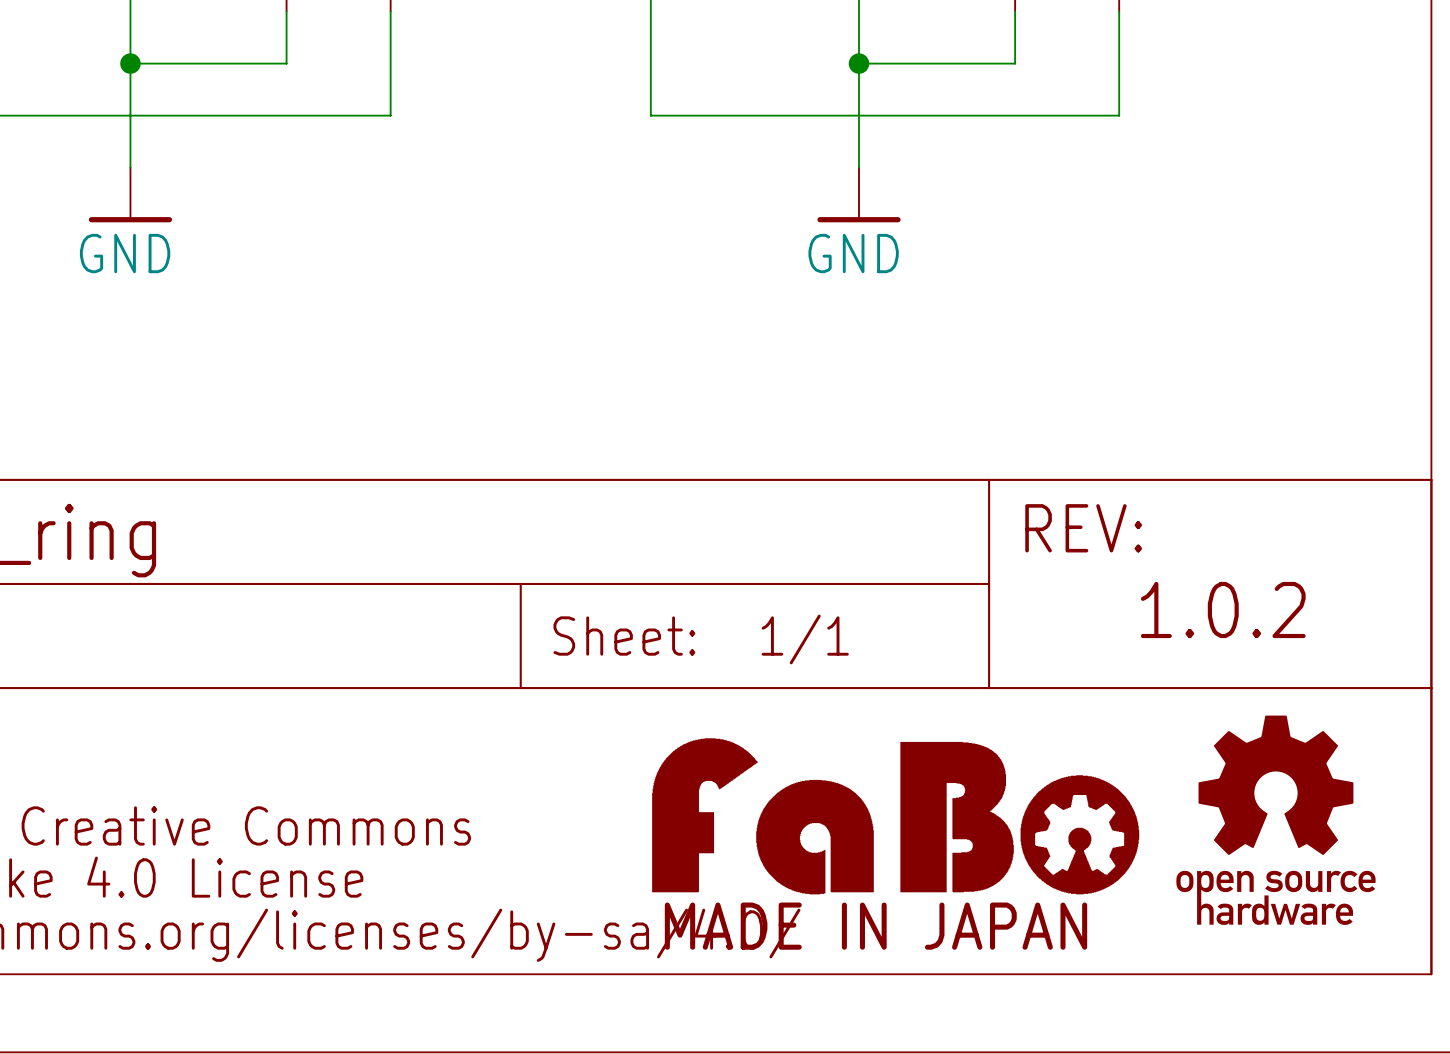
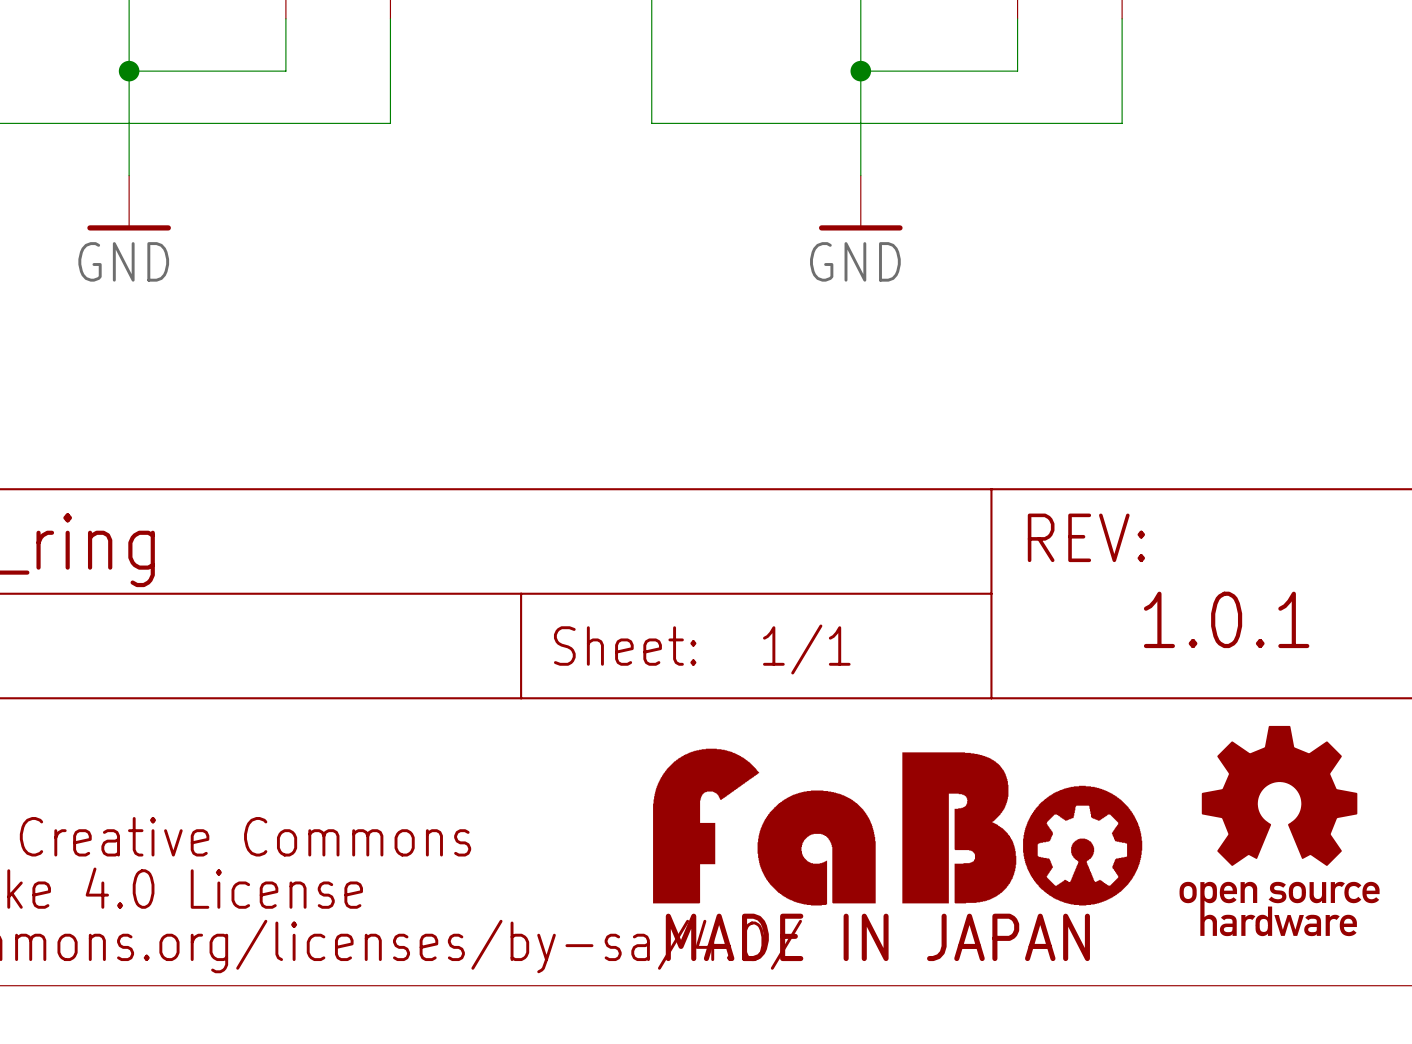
text: 1.0.2 (1223, 610) -> 1.0.1 (1226, 619)

